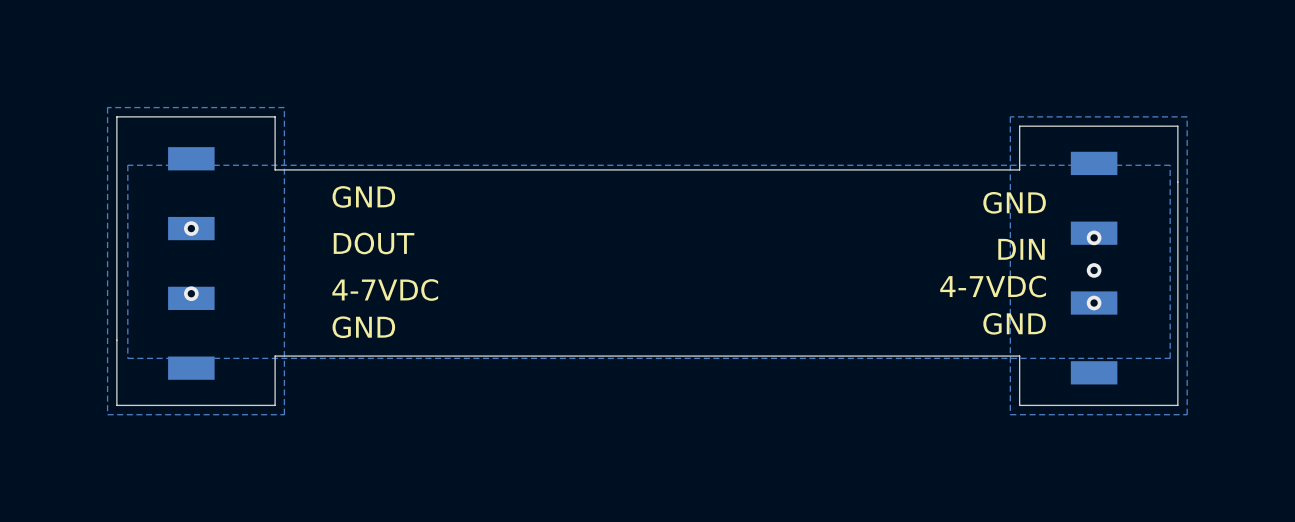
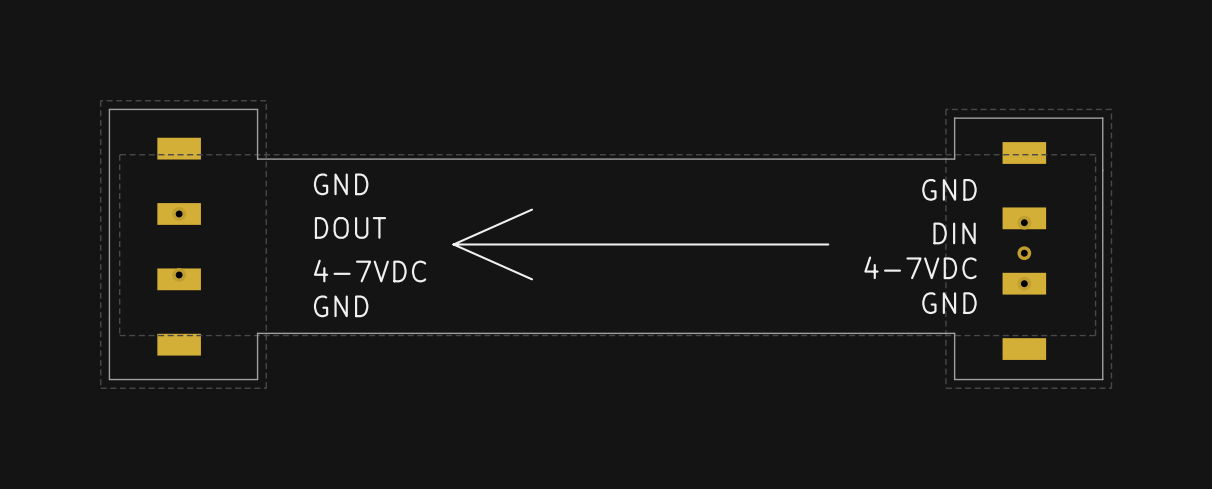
line: none -> (532, 209) (453, 244)
line: none -> (453, 244) (532, 279)
line: none -> (828, 244) (453, 244)

